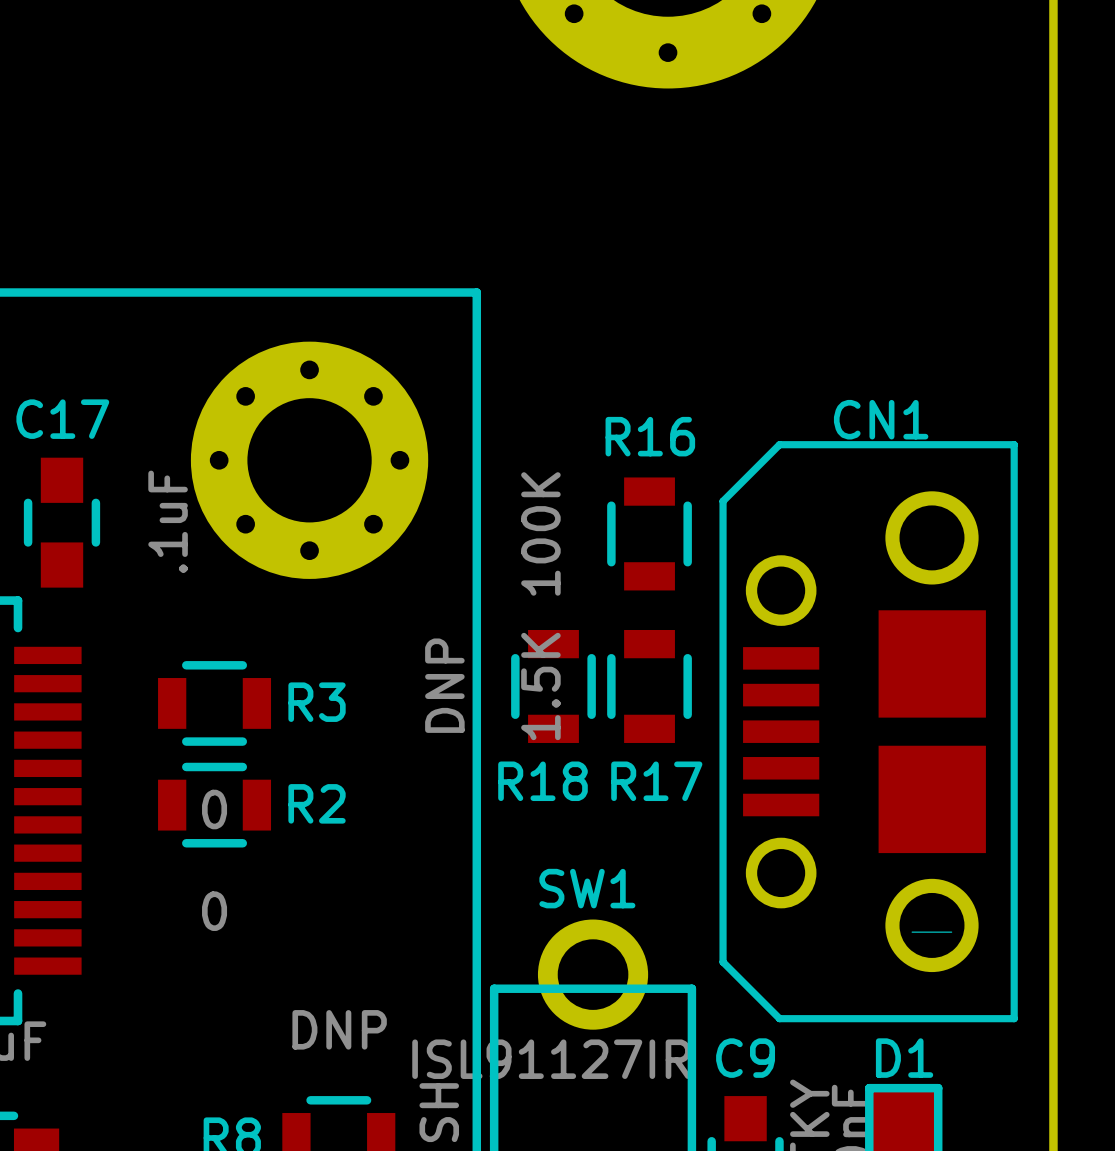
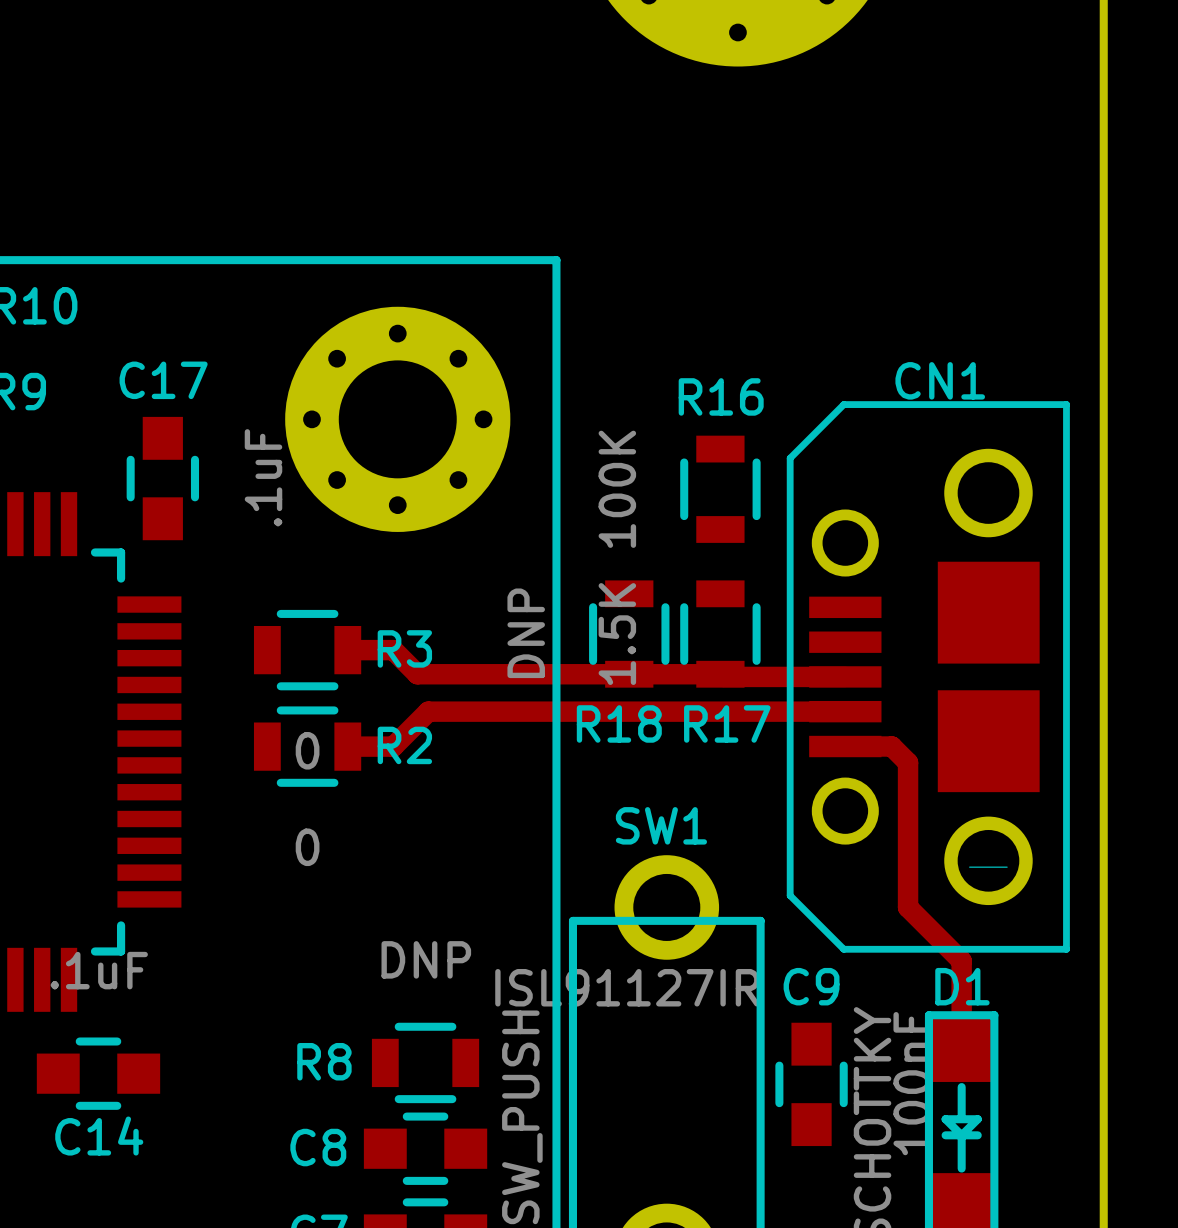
top track: none -> (347, 650) (393, 650) (417, 674) (720, 674) (723, 676) (845, 676)
top track: none -> (845, 711) (428, 711) (393, 746) (347, 746)
top track: none -> (845, 746) (891, 746) (908, 762) (908, 907) (961, 961) (961, 1048)

